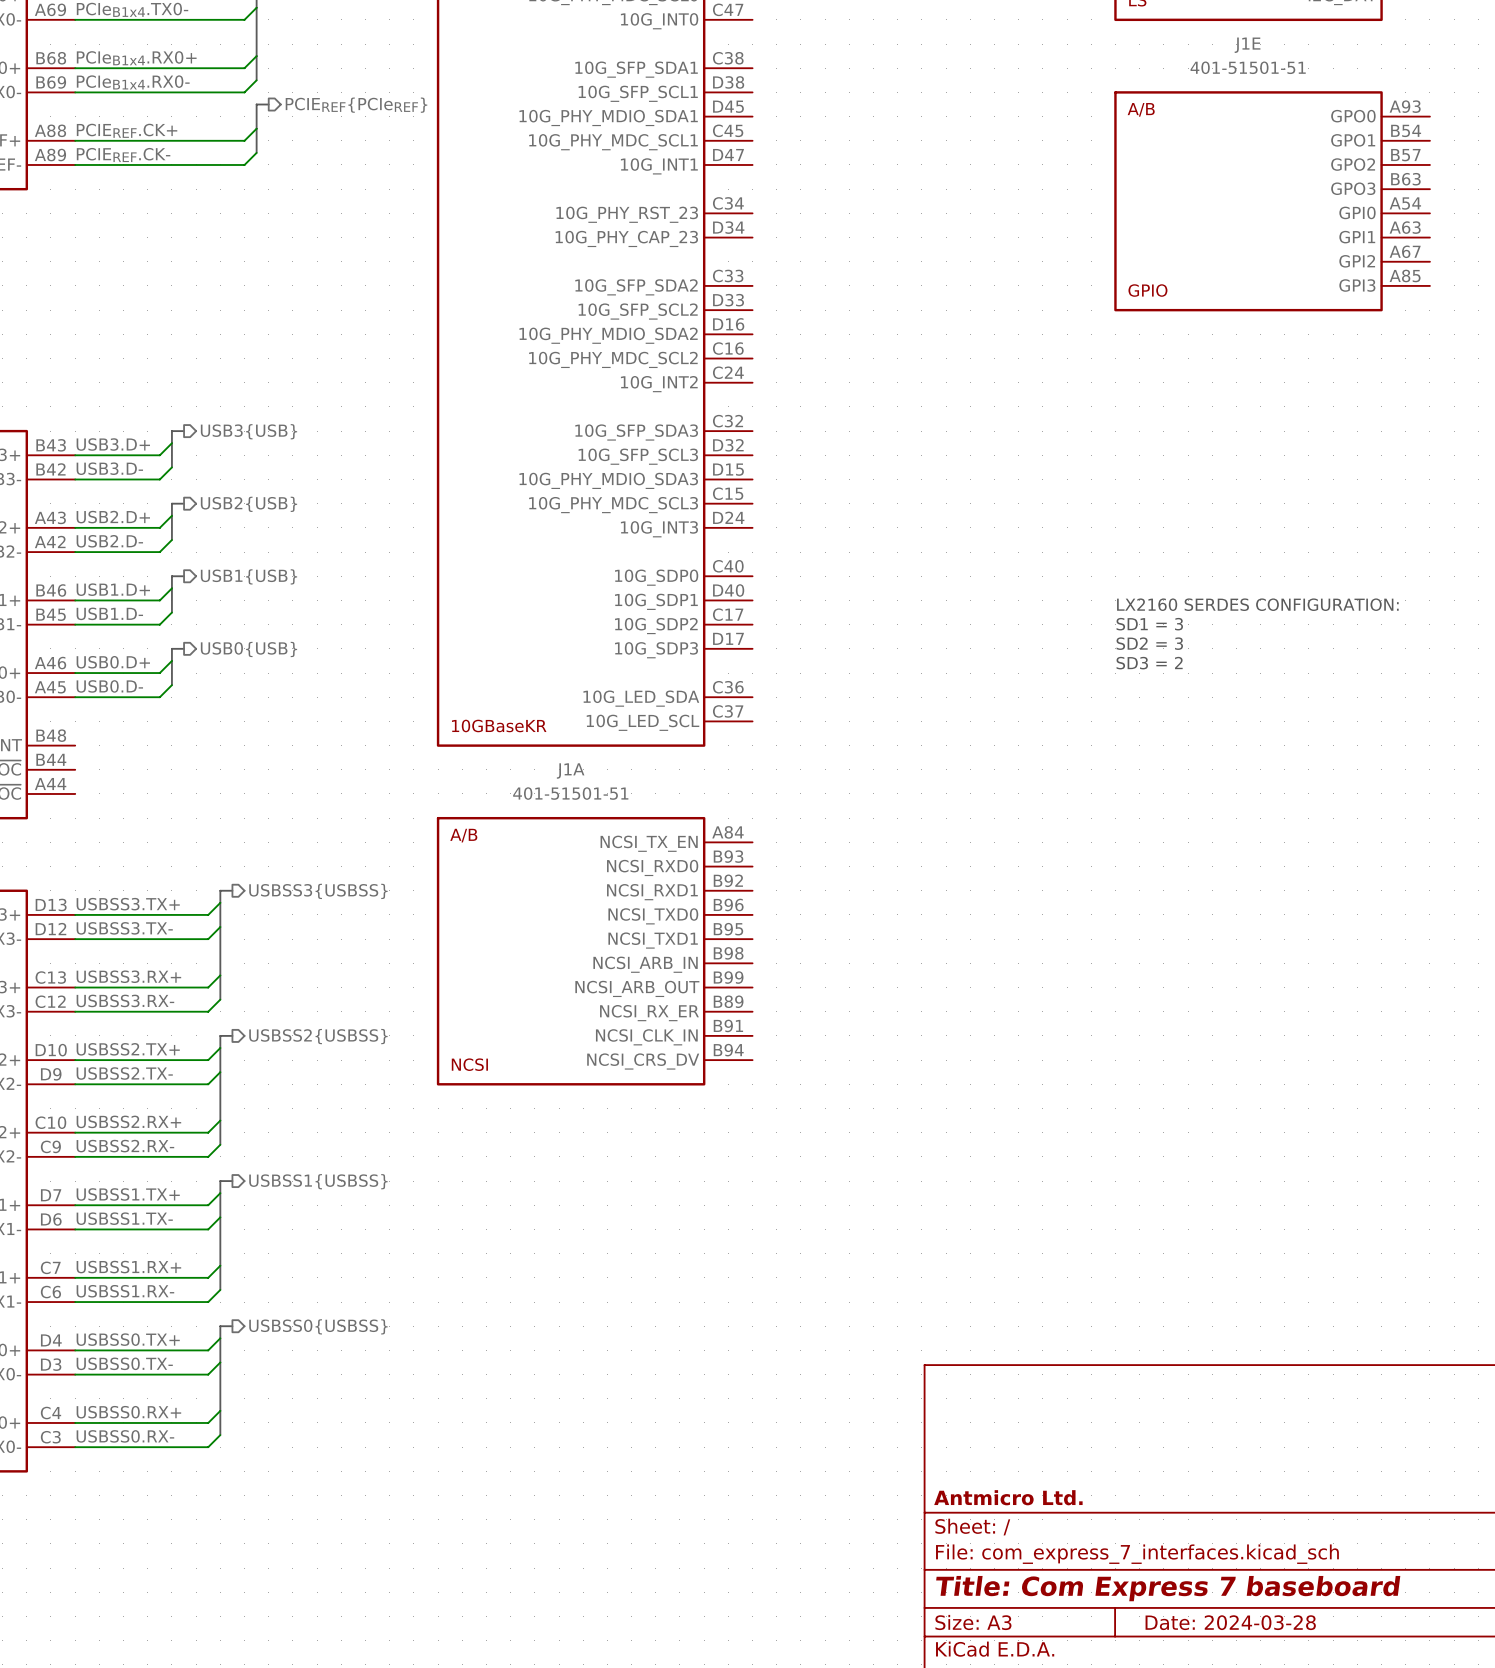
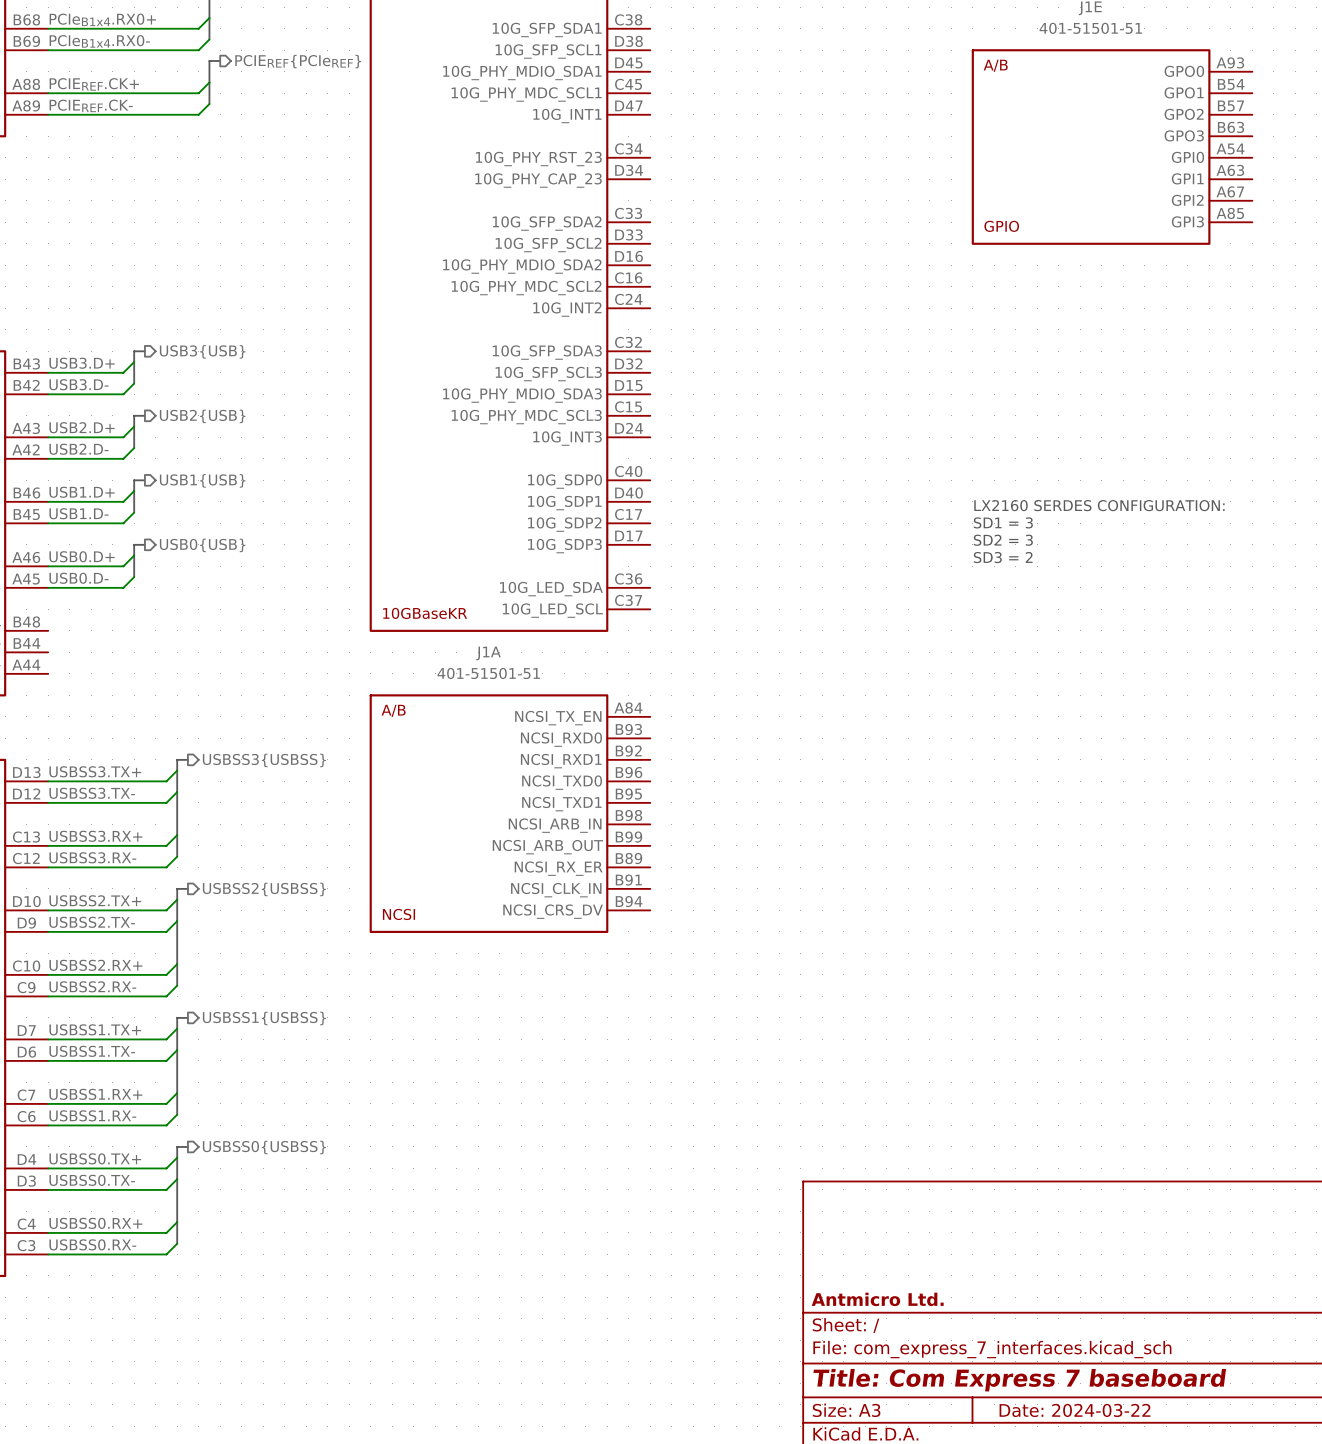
title block: Date: 2024-03-28 (1230, 1622) -> Date: 2024-03-22 (1075, 1410)

